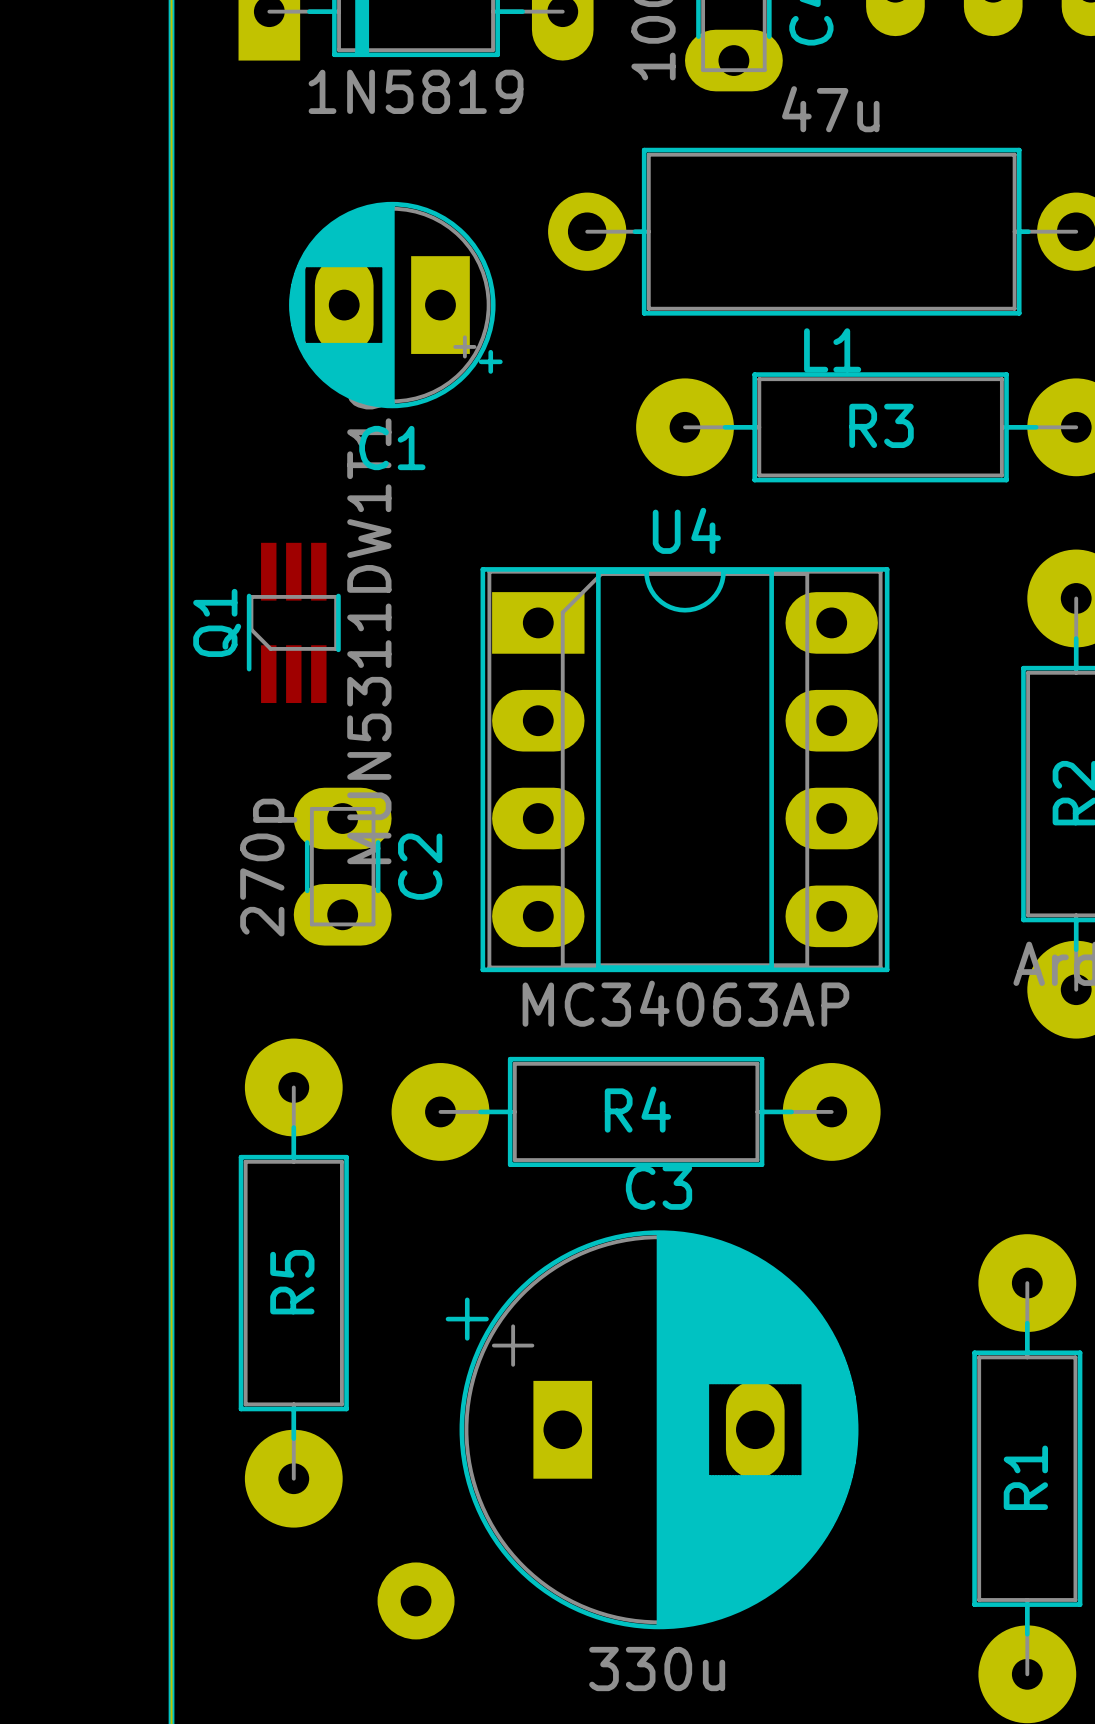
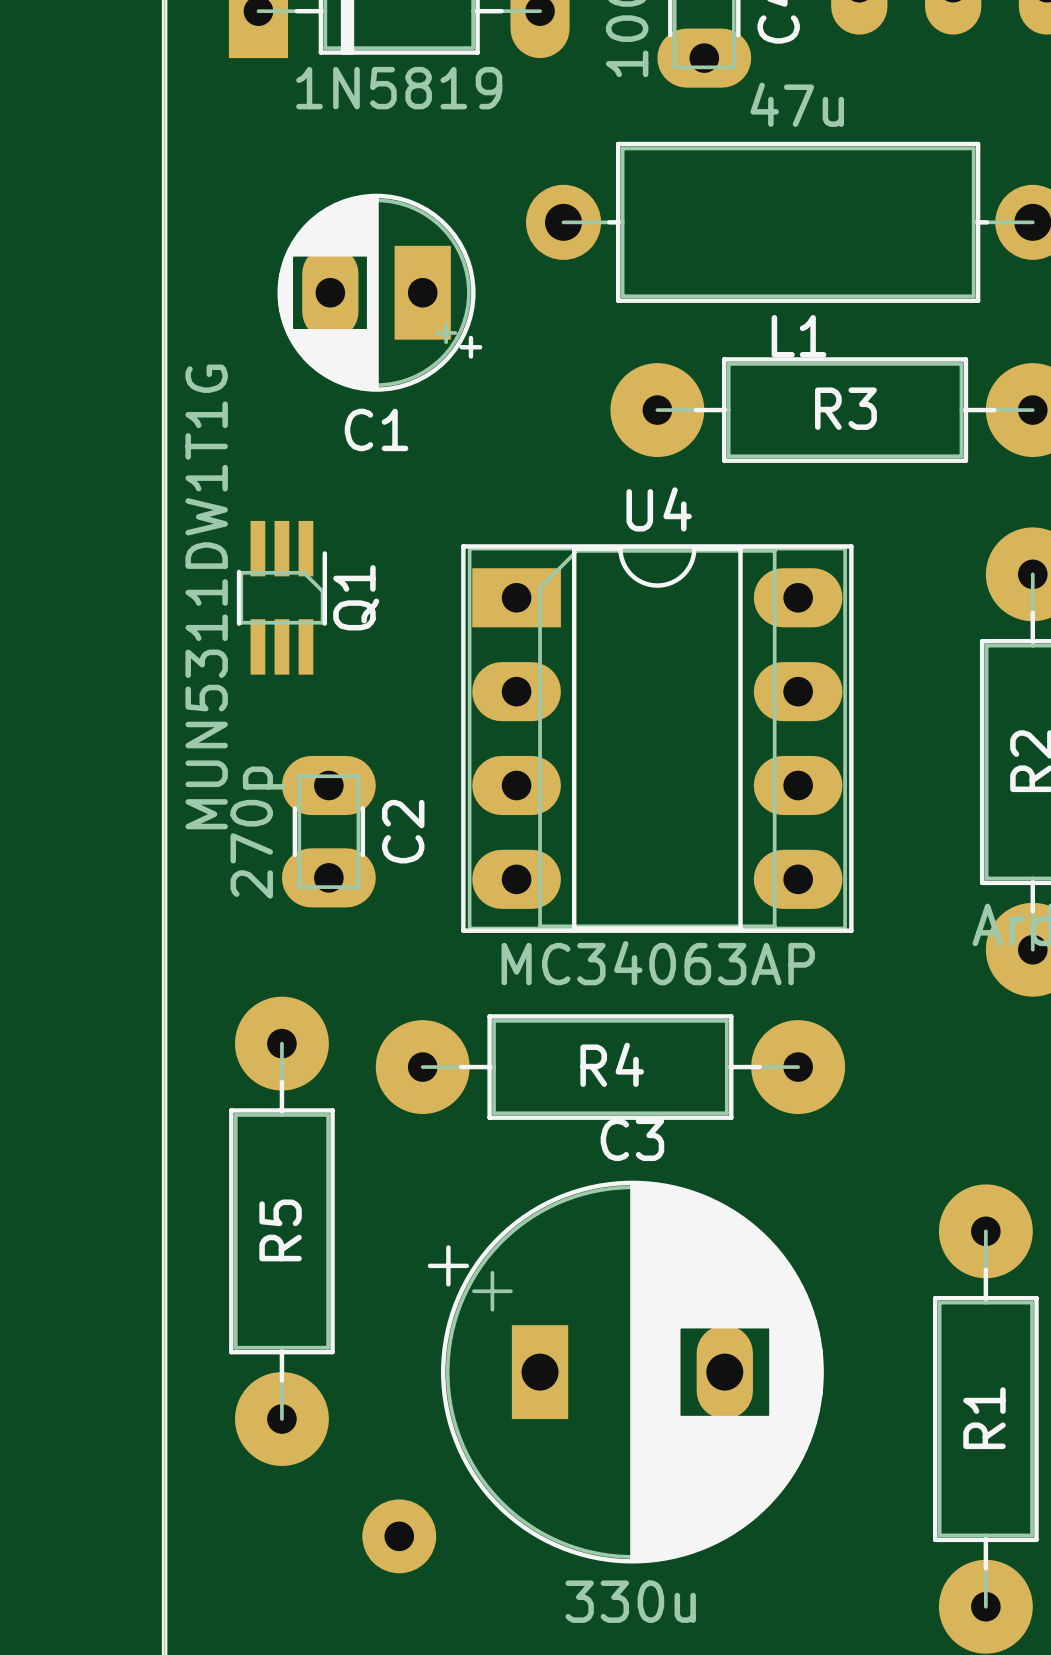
Q1 rotation: 0° (293, 622) -> 180° (281, 597)

